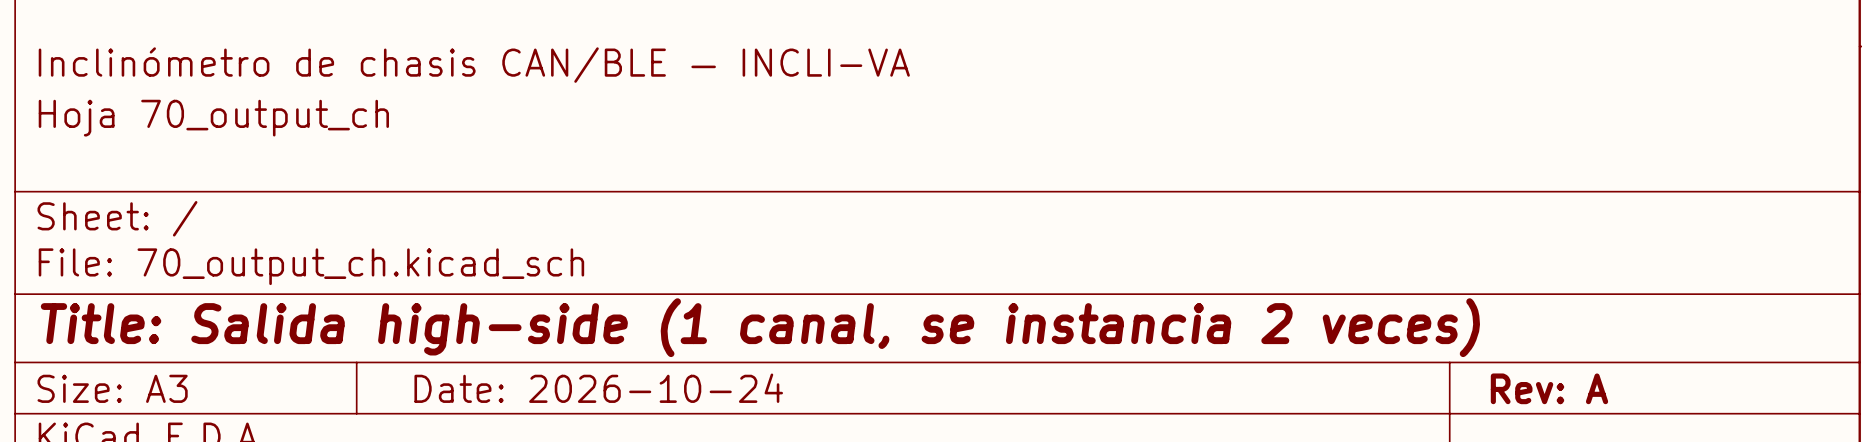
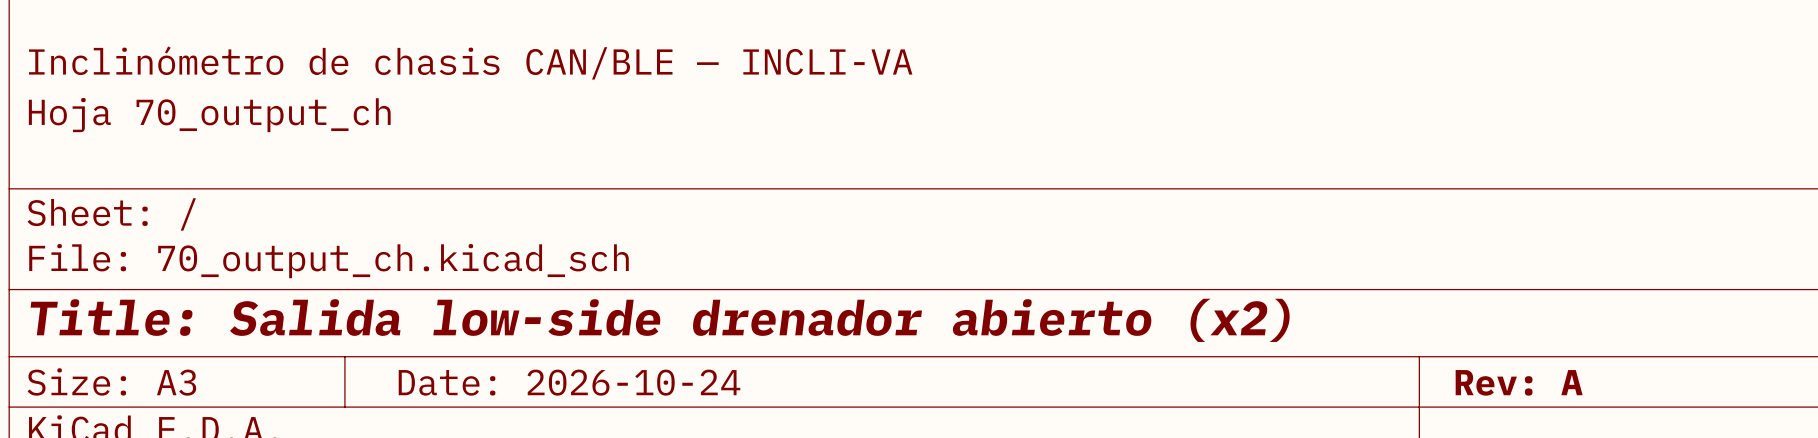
title block: Title: Salida high-side (1 canal, se instancia 2 veces) (760, 327) -> Title: Salida low-side drenador abierto (x2) (660, 320)

